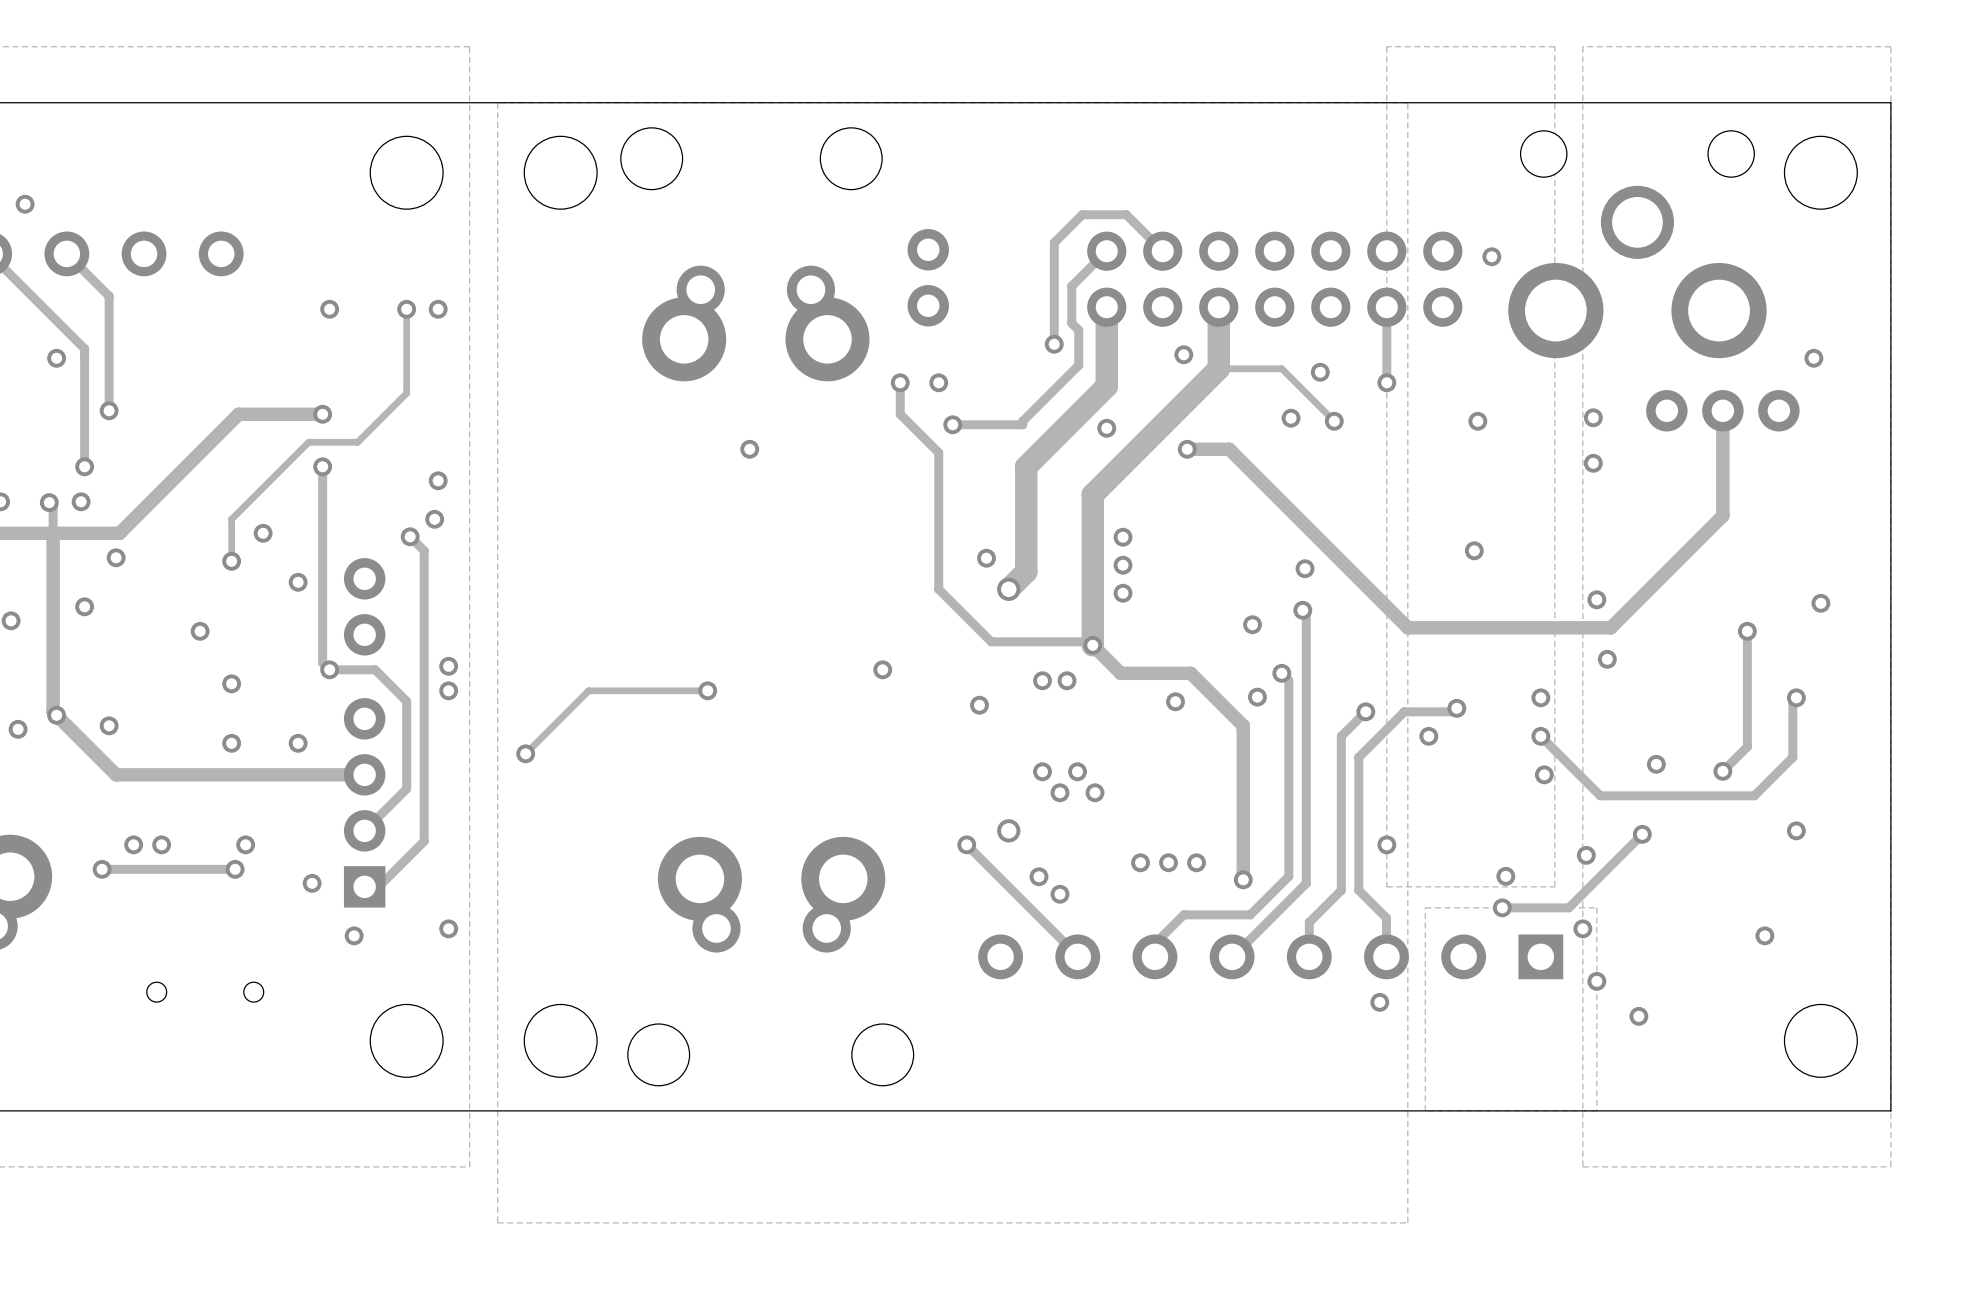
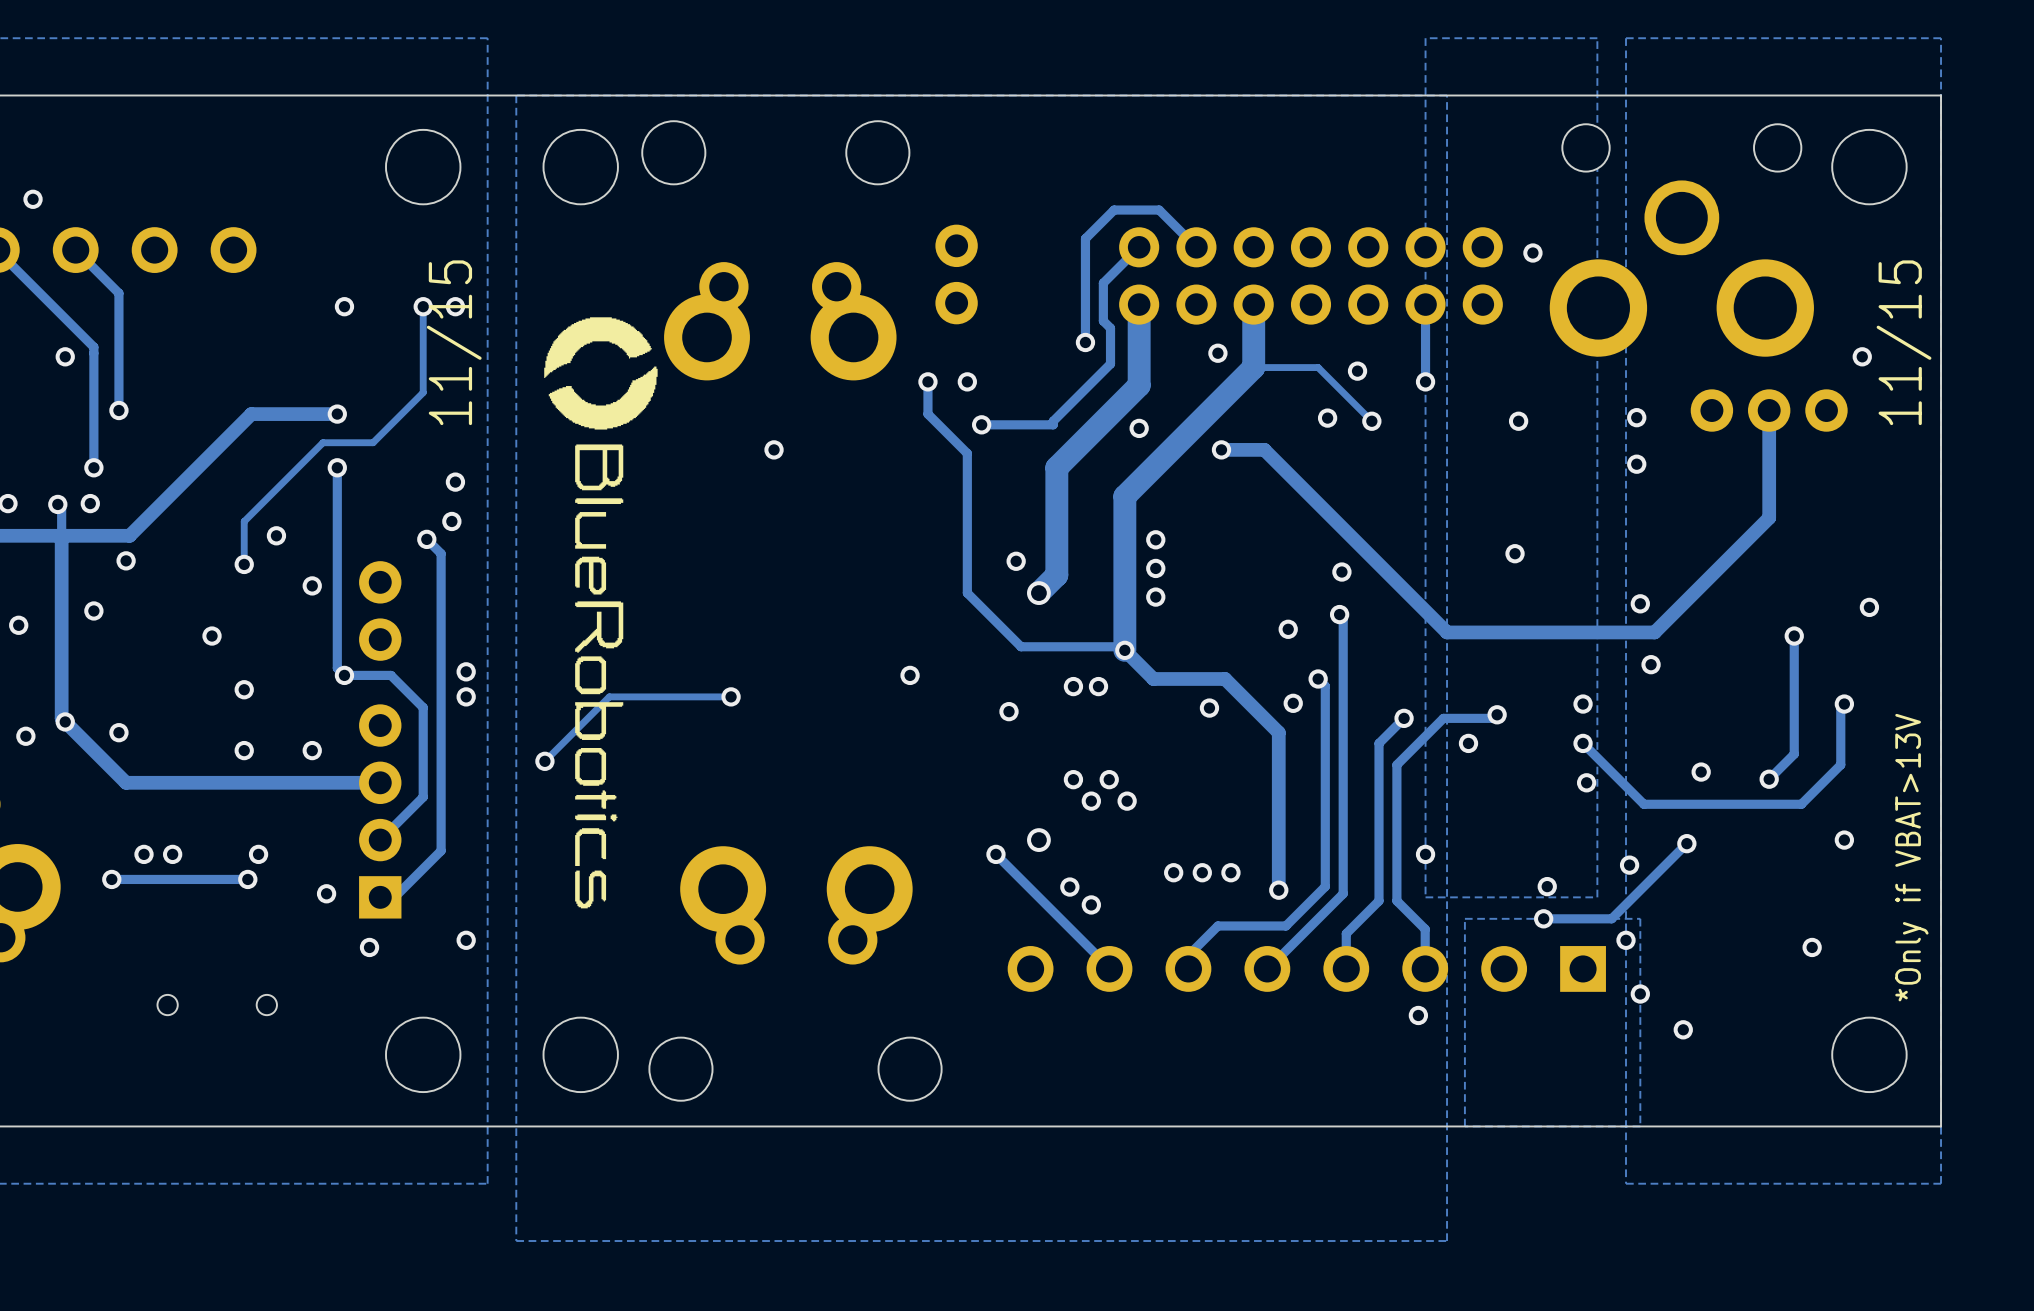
text: none -> 11/15 (454, 342)
text: none -> 11/15 (1904, 342)
drawing: none -> [544, 317, 658, 909]
text: none -> *Only if VBAT>13V (1911, 857)

